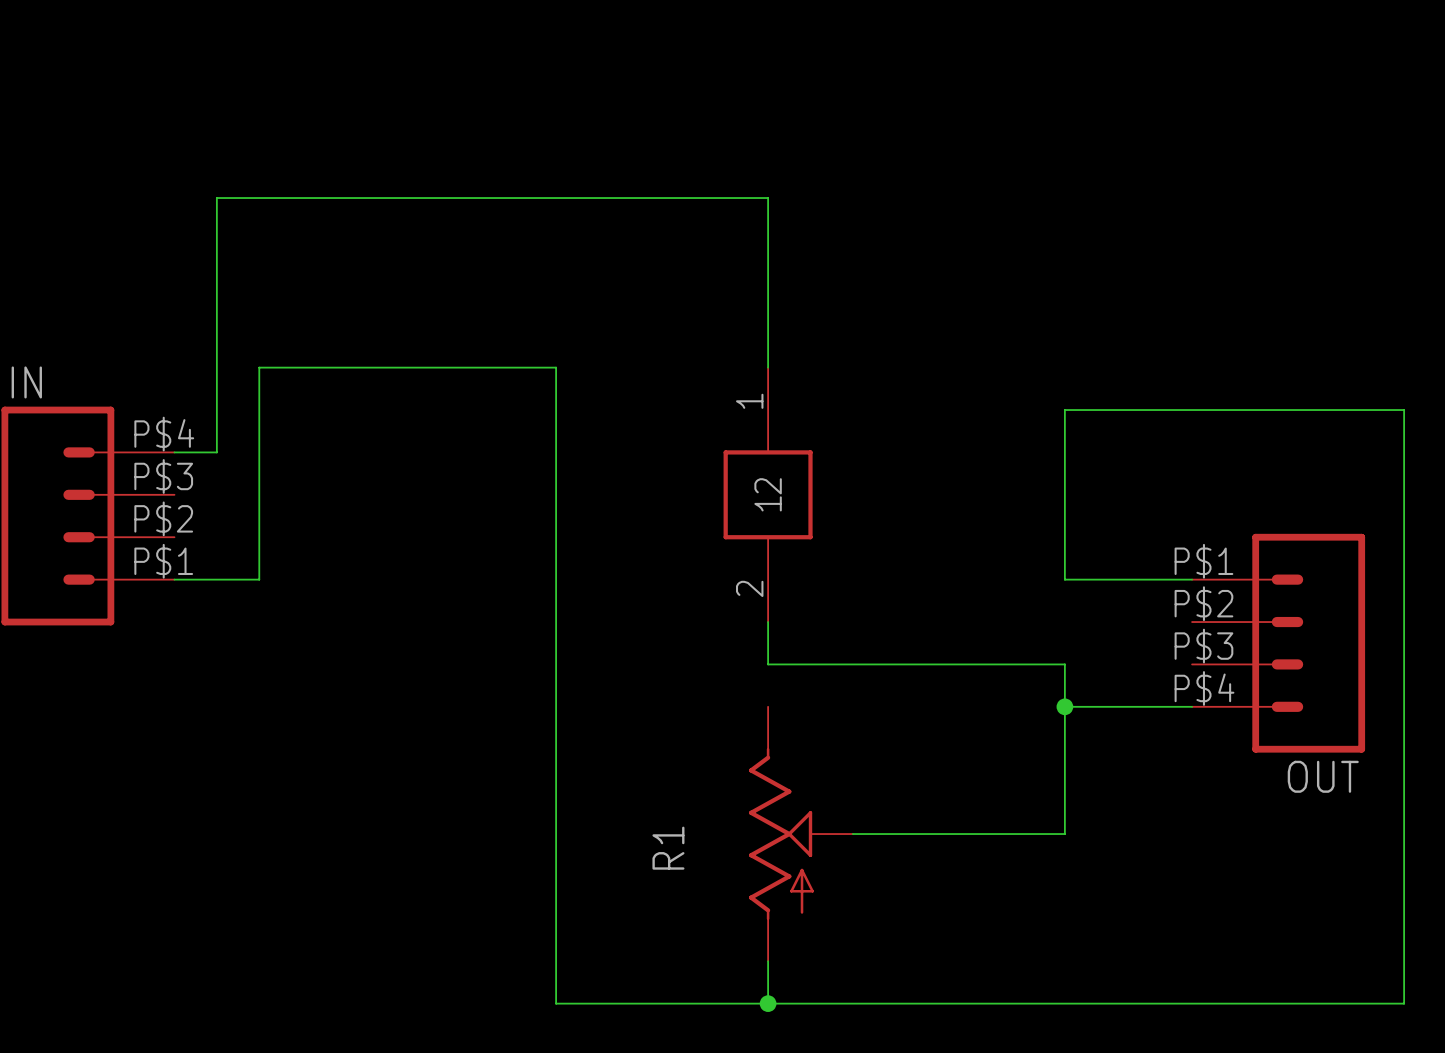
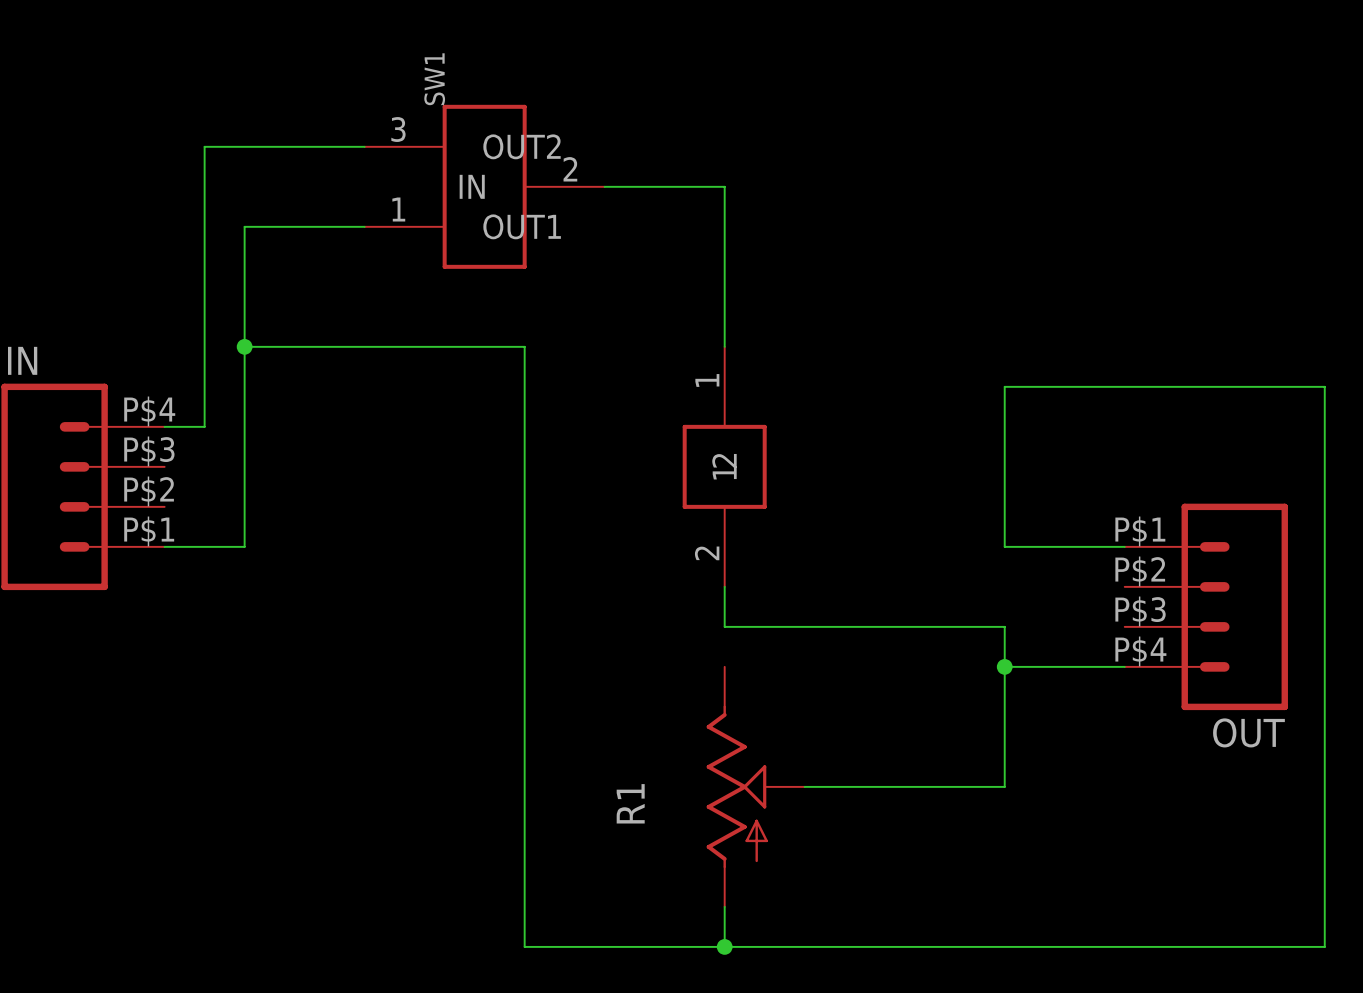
wire: (216, 198) (640, 198) -> (204, 186) (204, 146) (364, 146)
SW1: none -> (484, 186)
wire: none -> (364, 226) (244, 226) (244, 346)
junction: none -> (244, 346)

